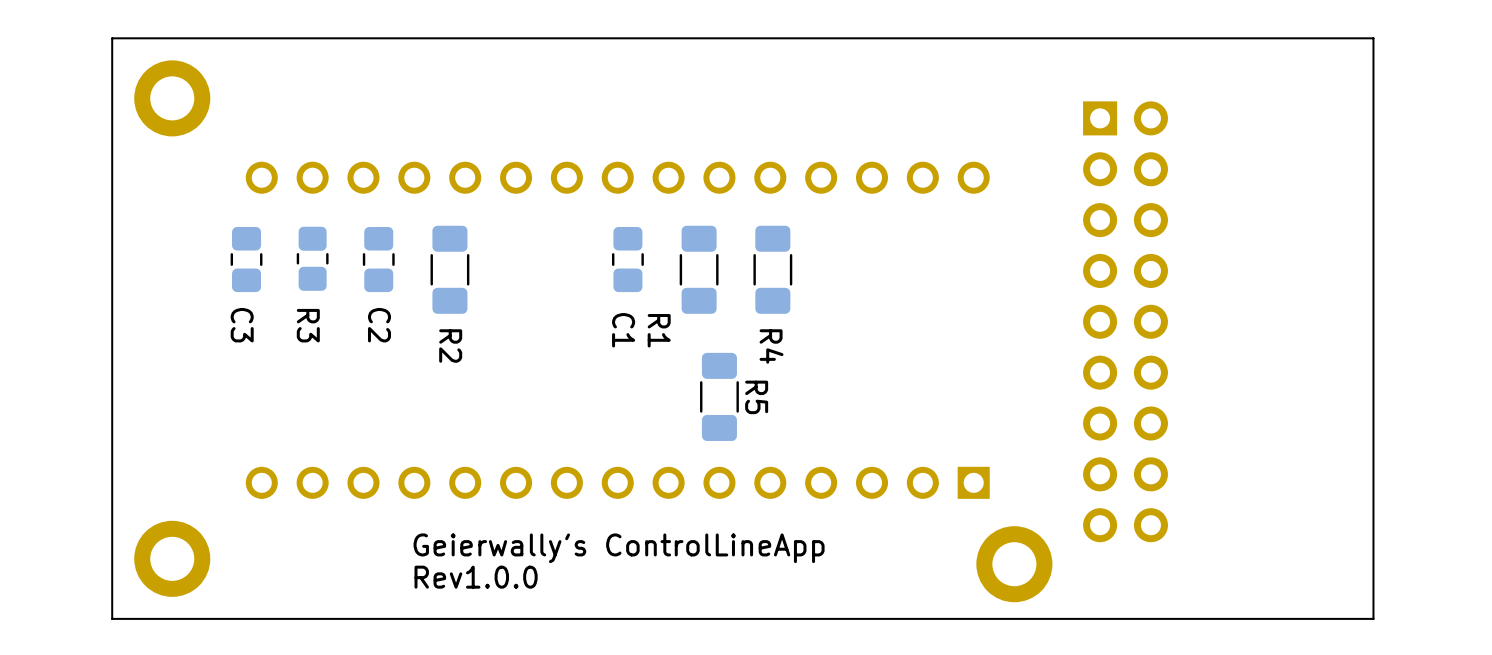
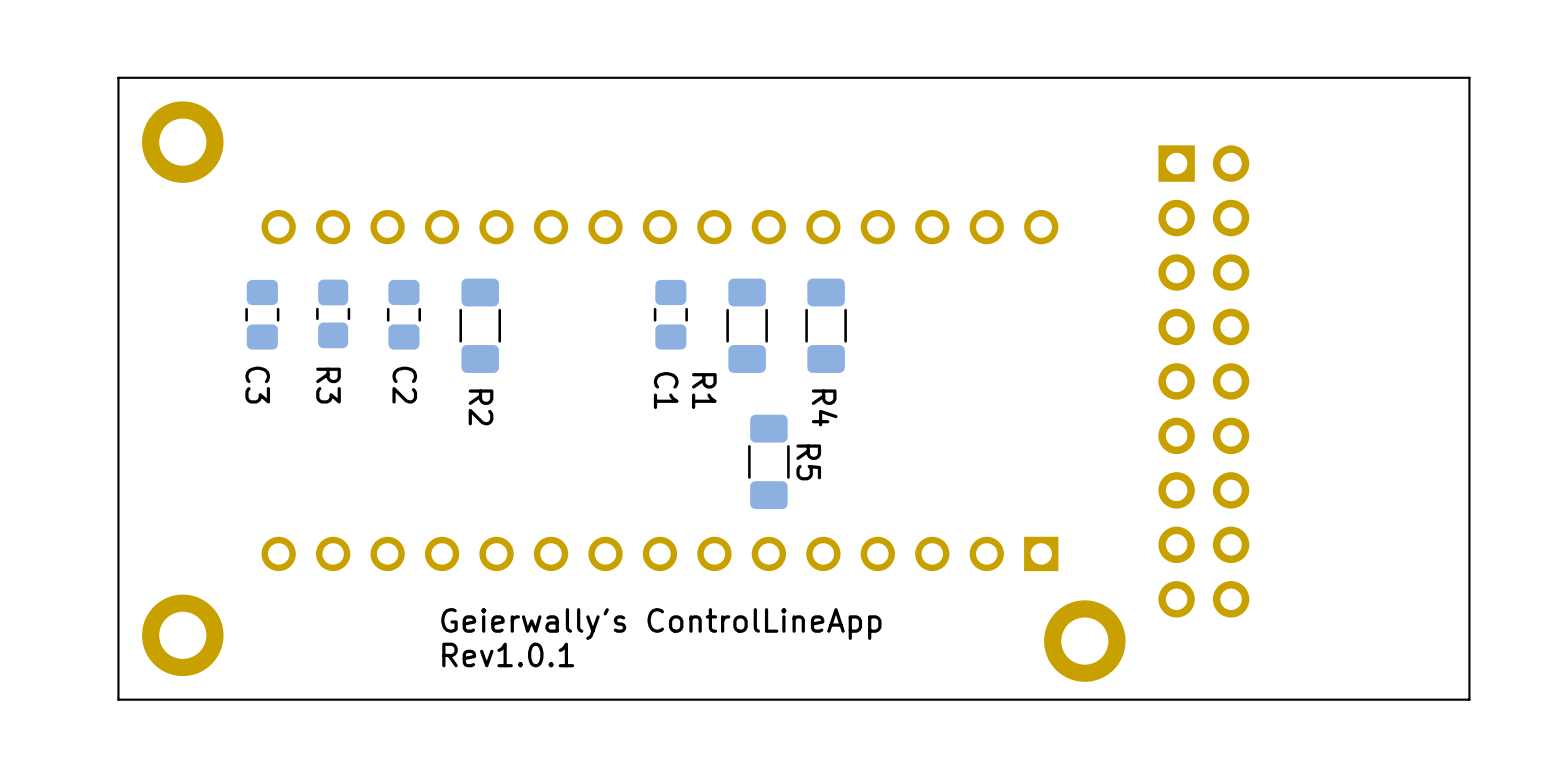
text: Rev1.0.0 (476, 577) -> Rev1.0.1 (508, 654)

